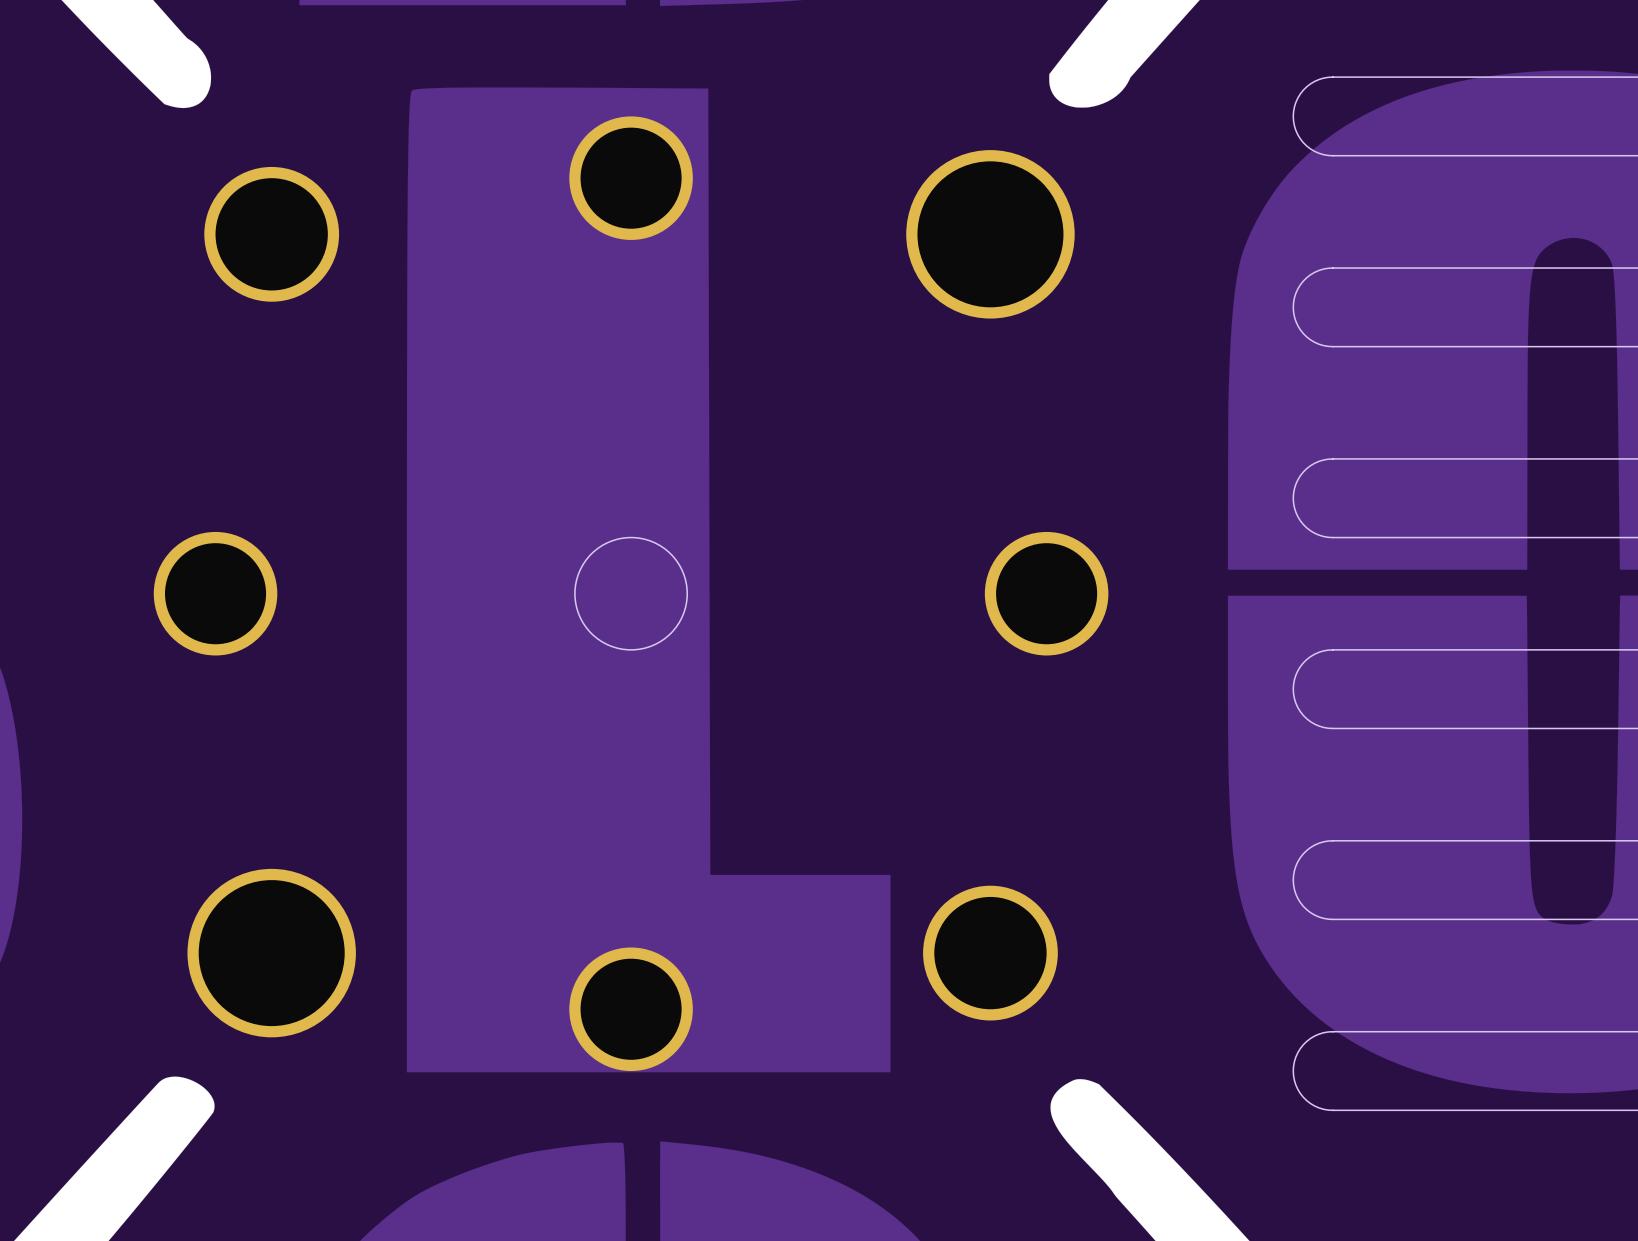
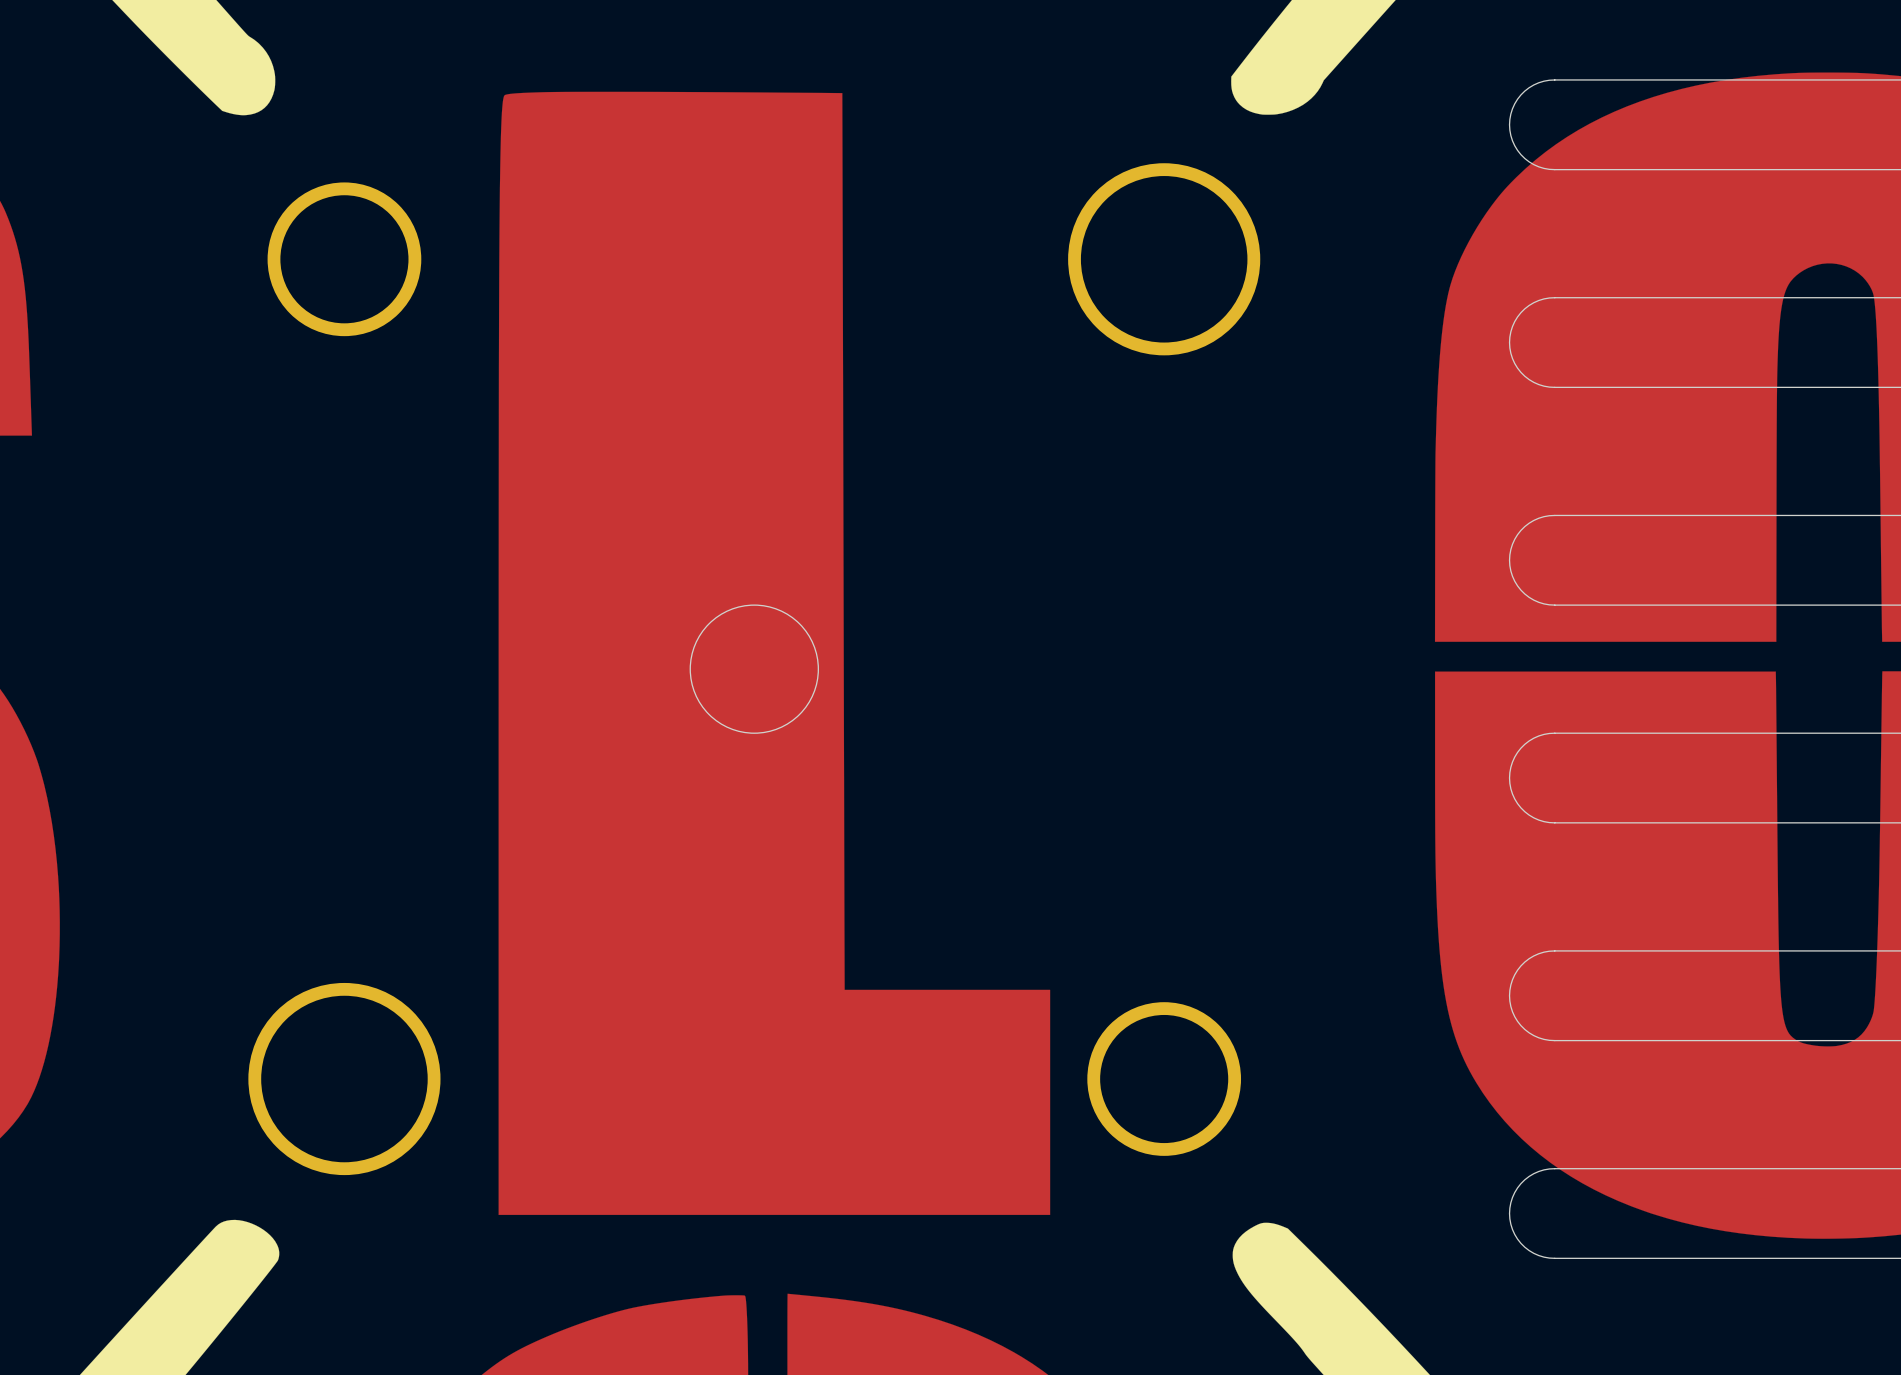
part: (631, 178) -> none
part: (215, 593) -> none
part: (1046, 593) -> none
part: (631, 1009) -> none

